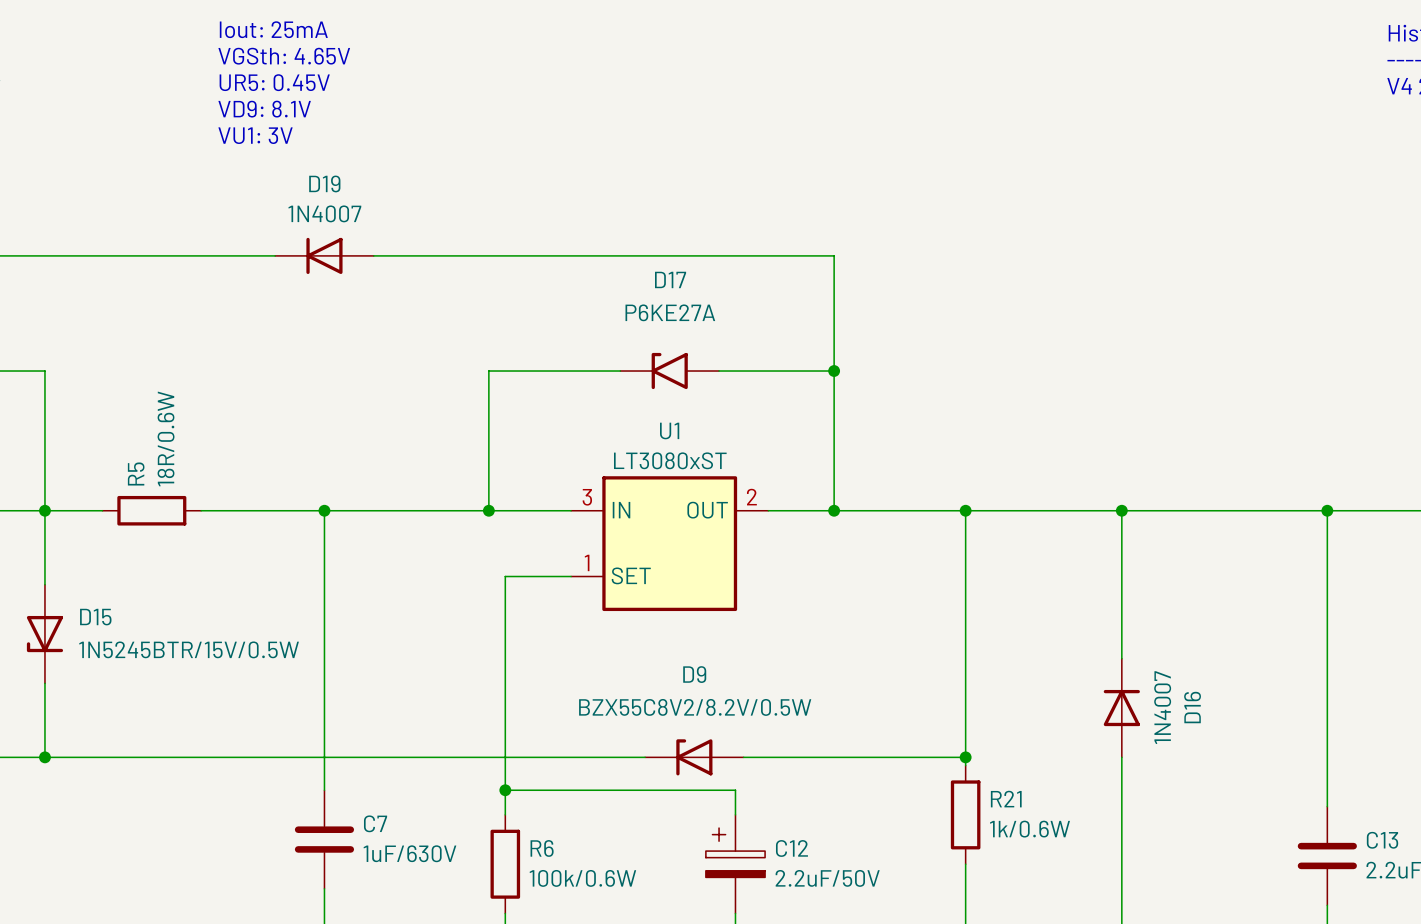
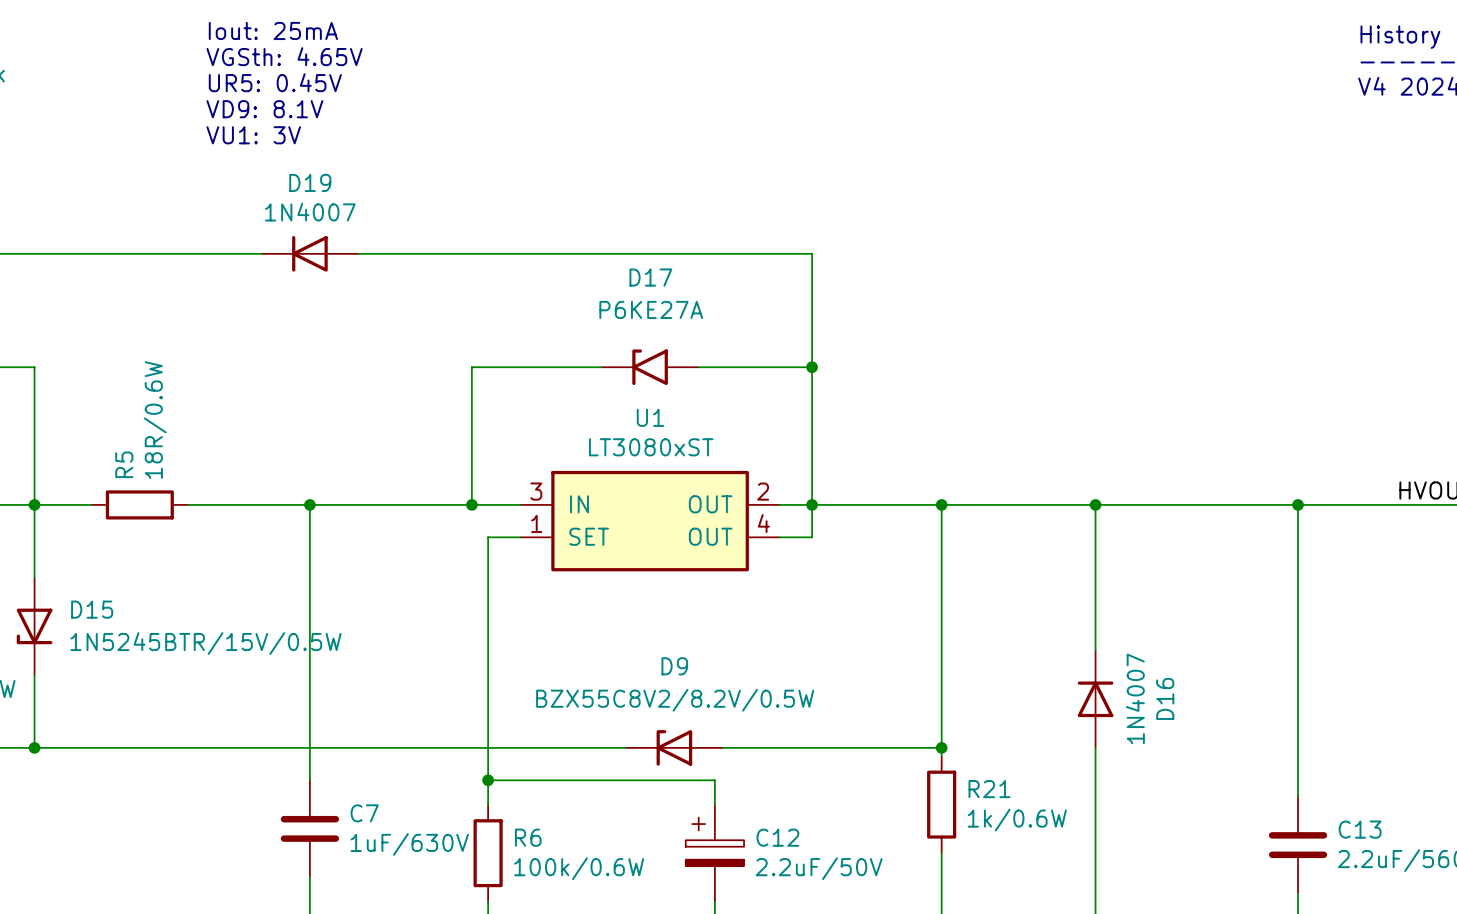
U1 symbol: [571, 476, 769, 612] -> [520, 470, 780, 572]
wire: none -> (812, 504) (812, 537) (779, 537)
wire: (505, 576) (571, 576) -> (488, 569) (488, 537) (520, 537)

